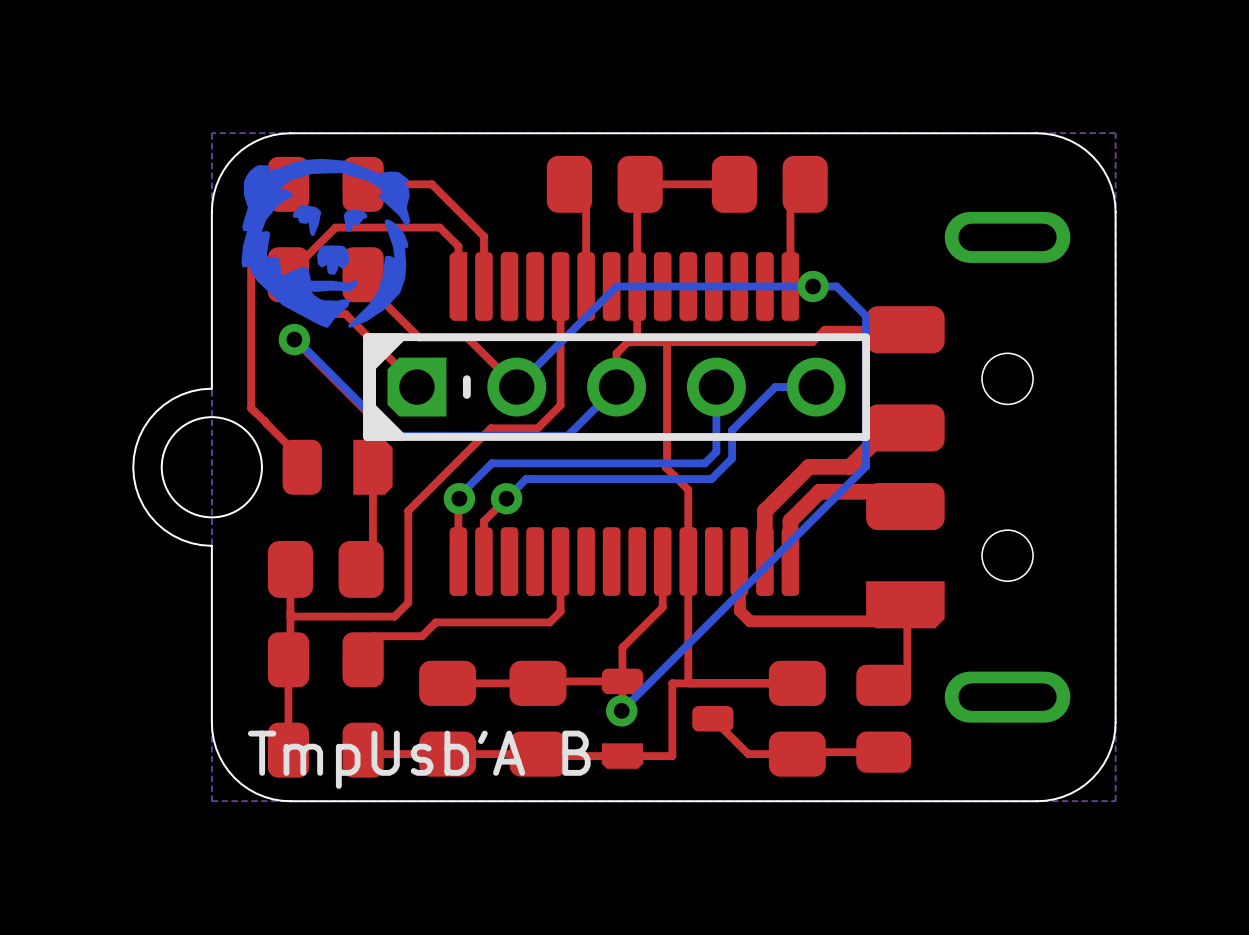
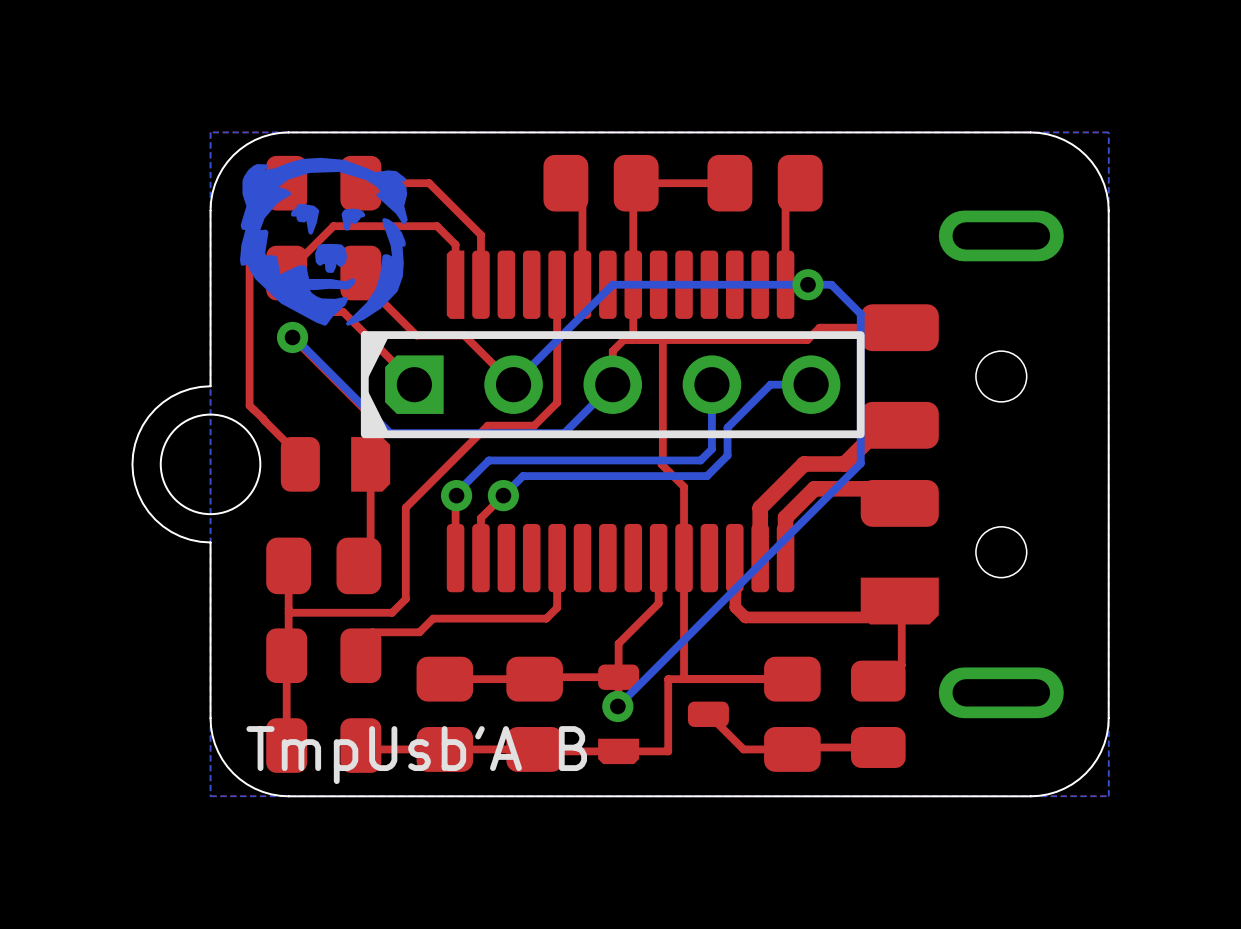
part footprint: [363, 333, 871, 441] -> [360, 331, 865, 439]

